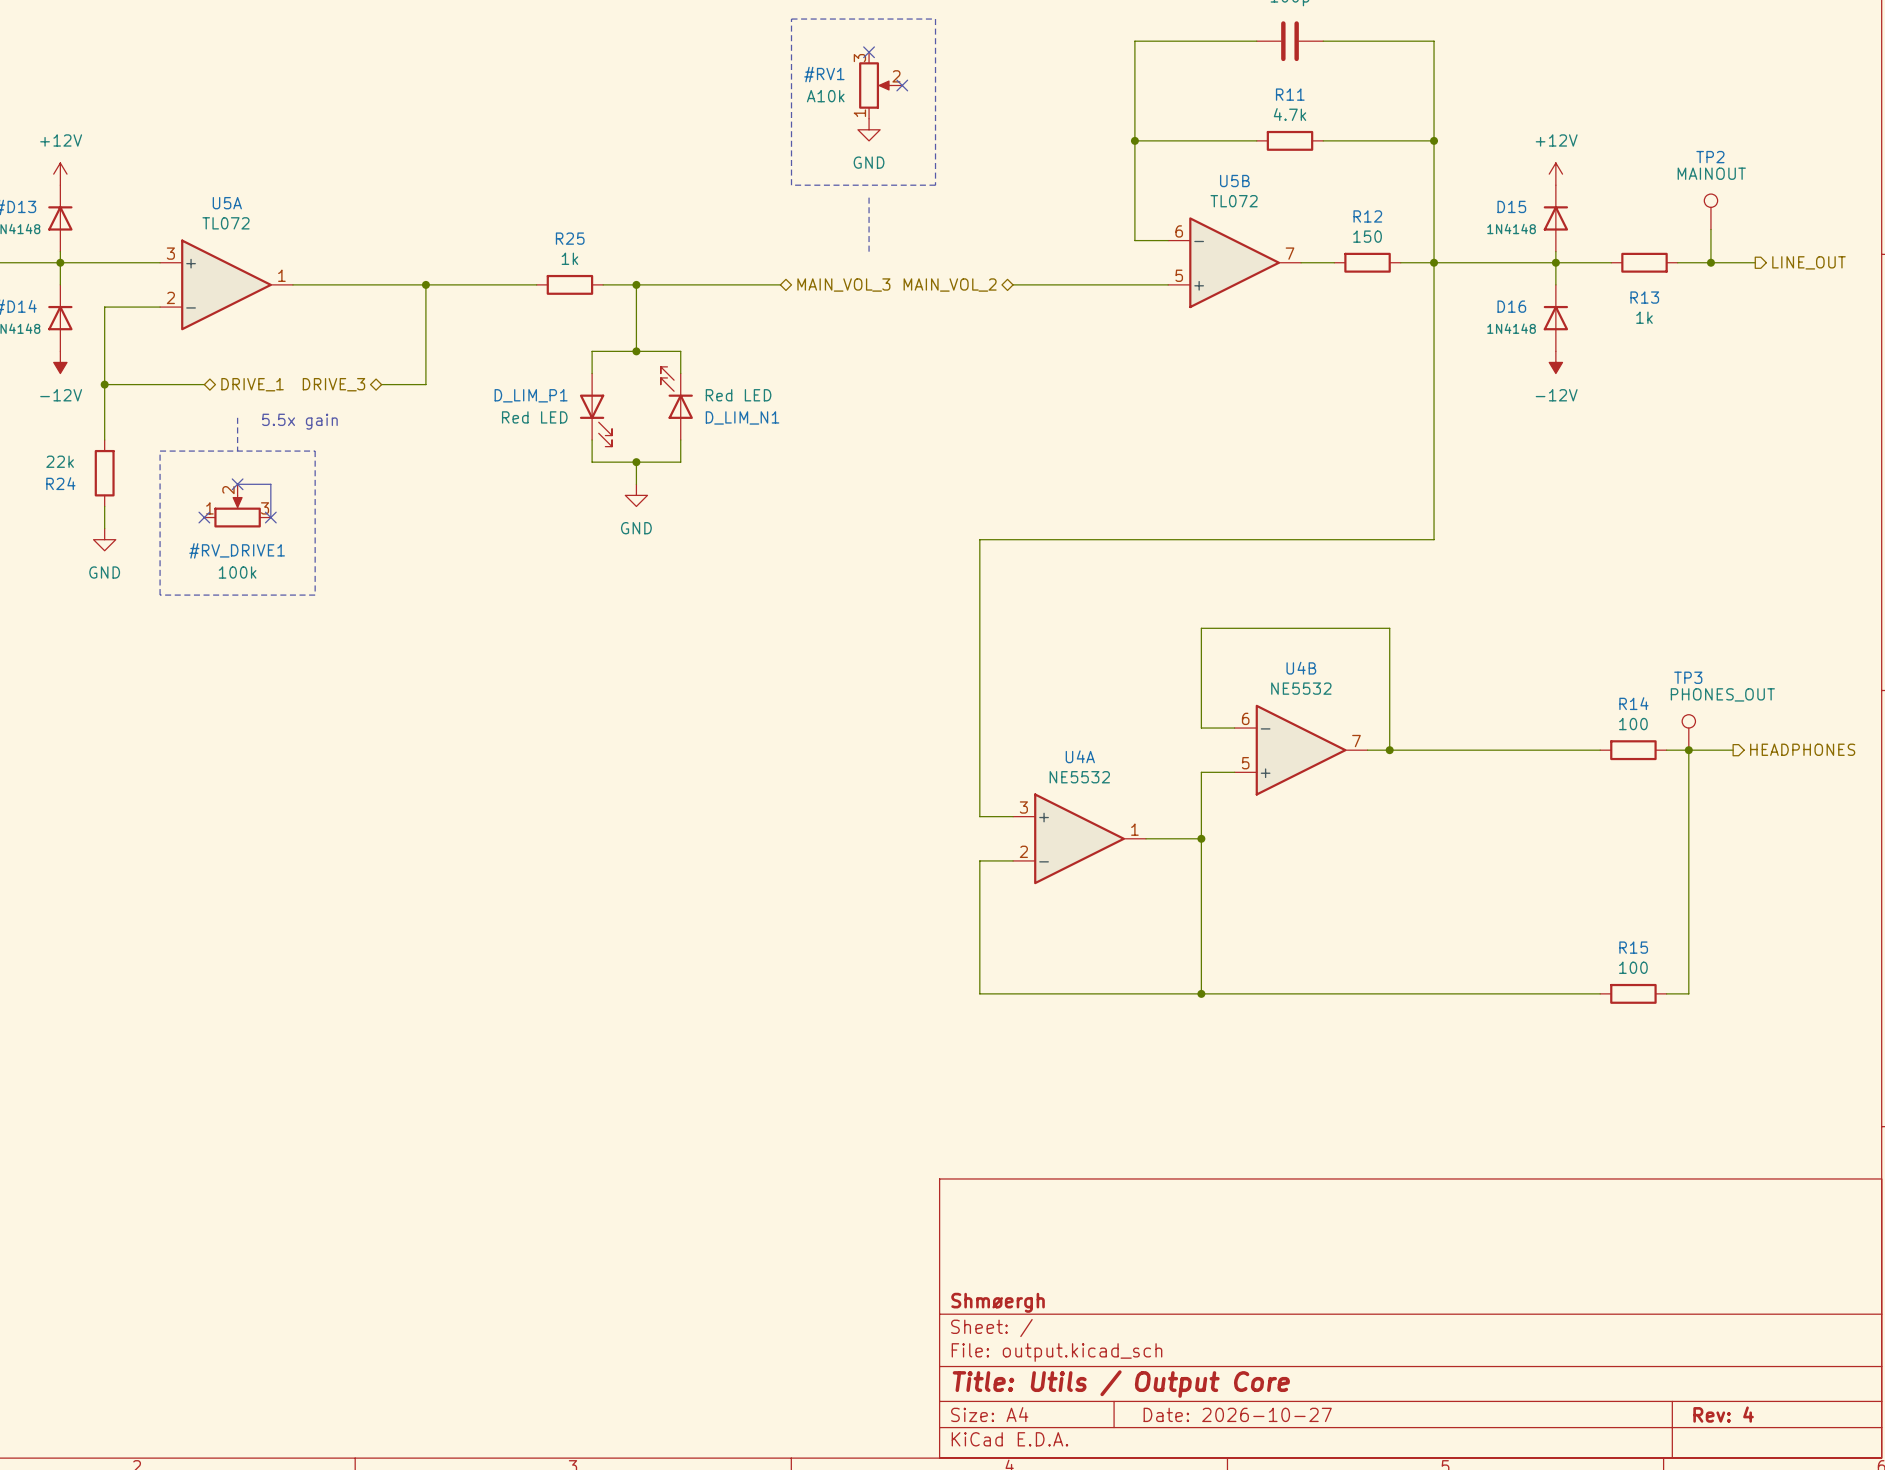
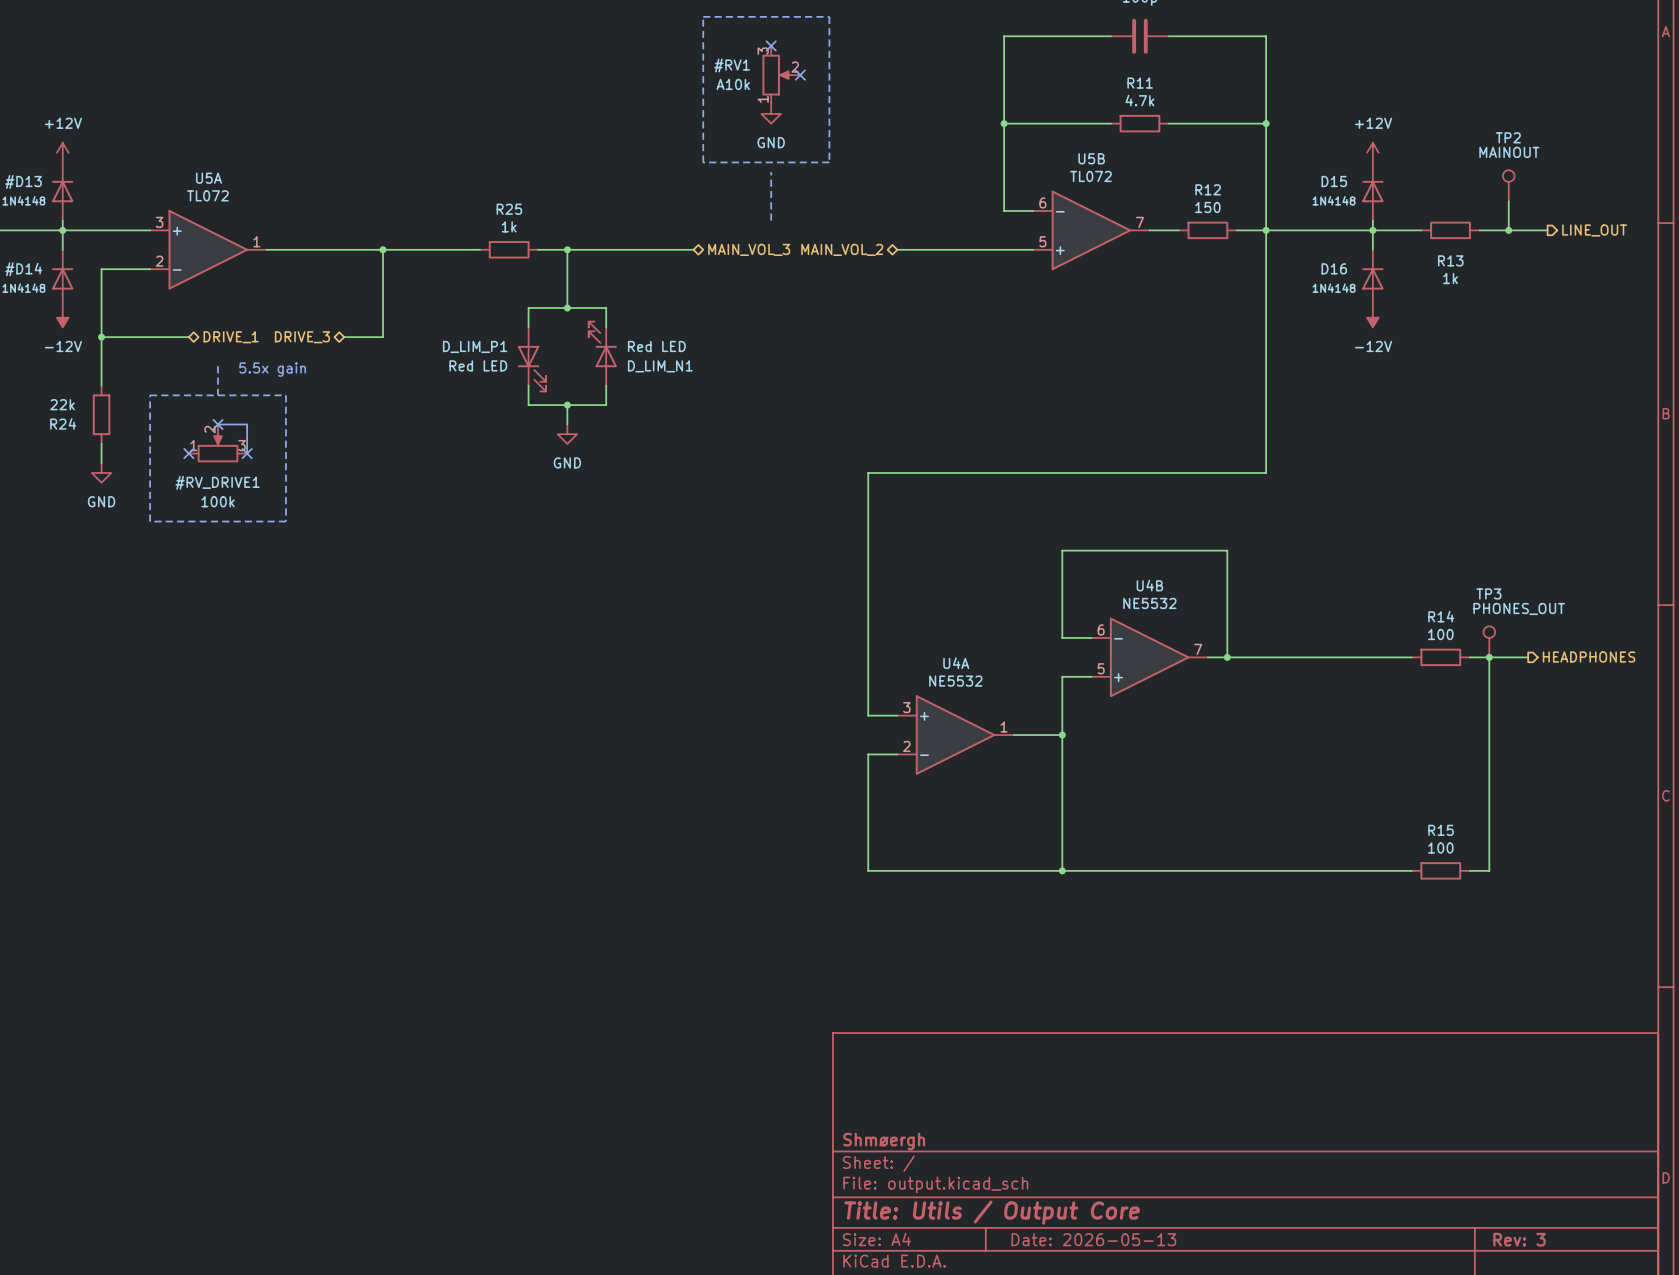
title block: Date: 2026-10-27 (1237, 1414) -> Date: 2026-05-13 (1093, 1239)
title block: Rev: 4 (1723, 1414) -> Rev: 3 (1519, 1239)

